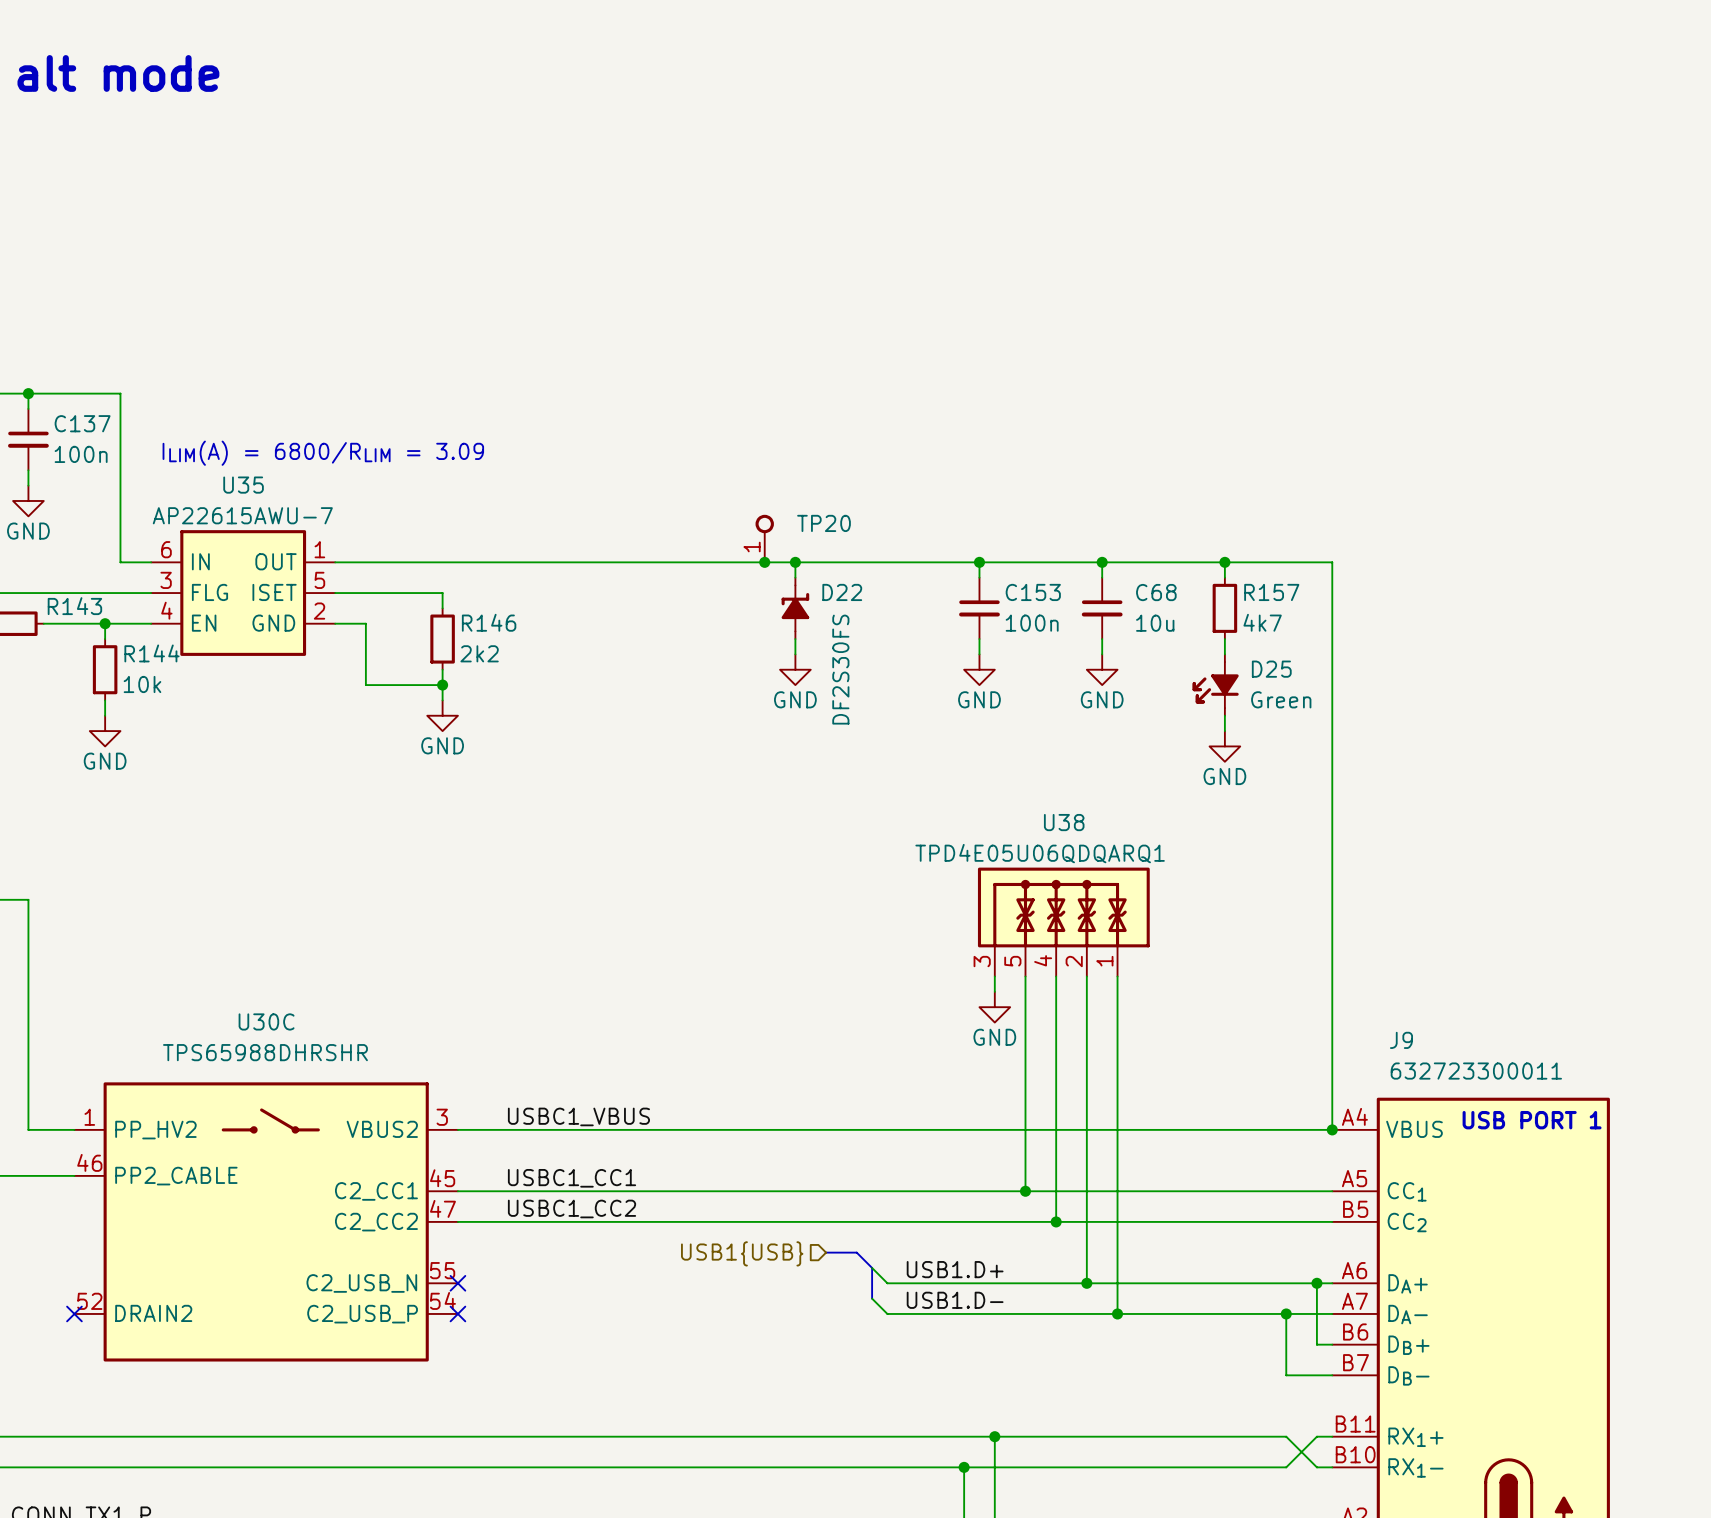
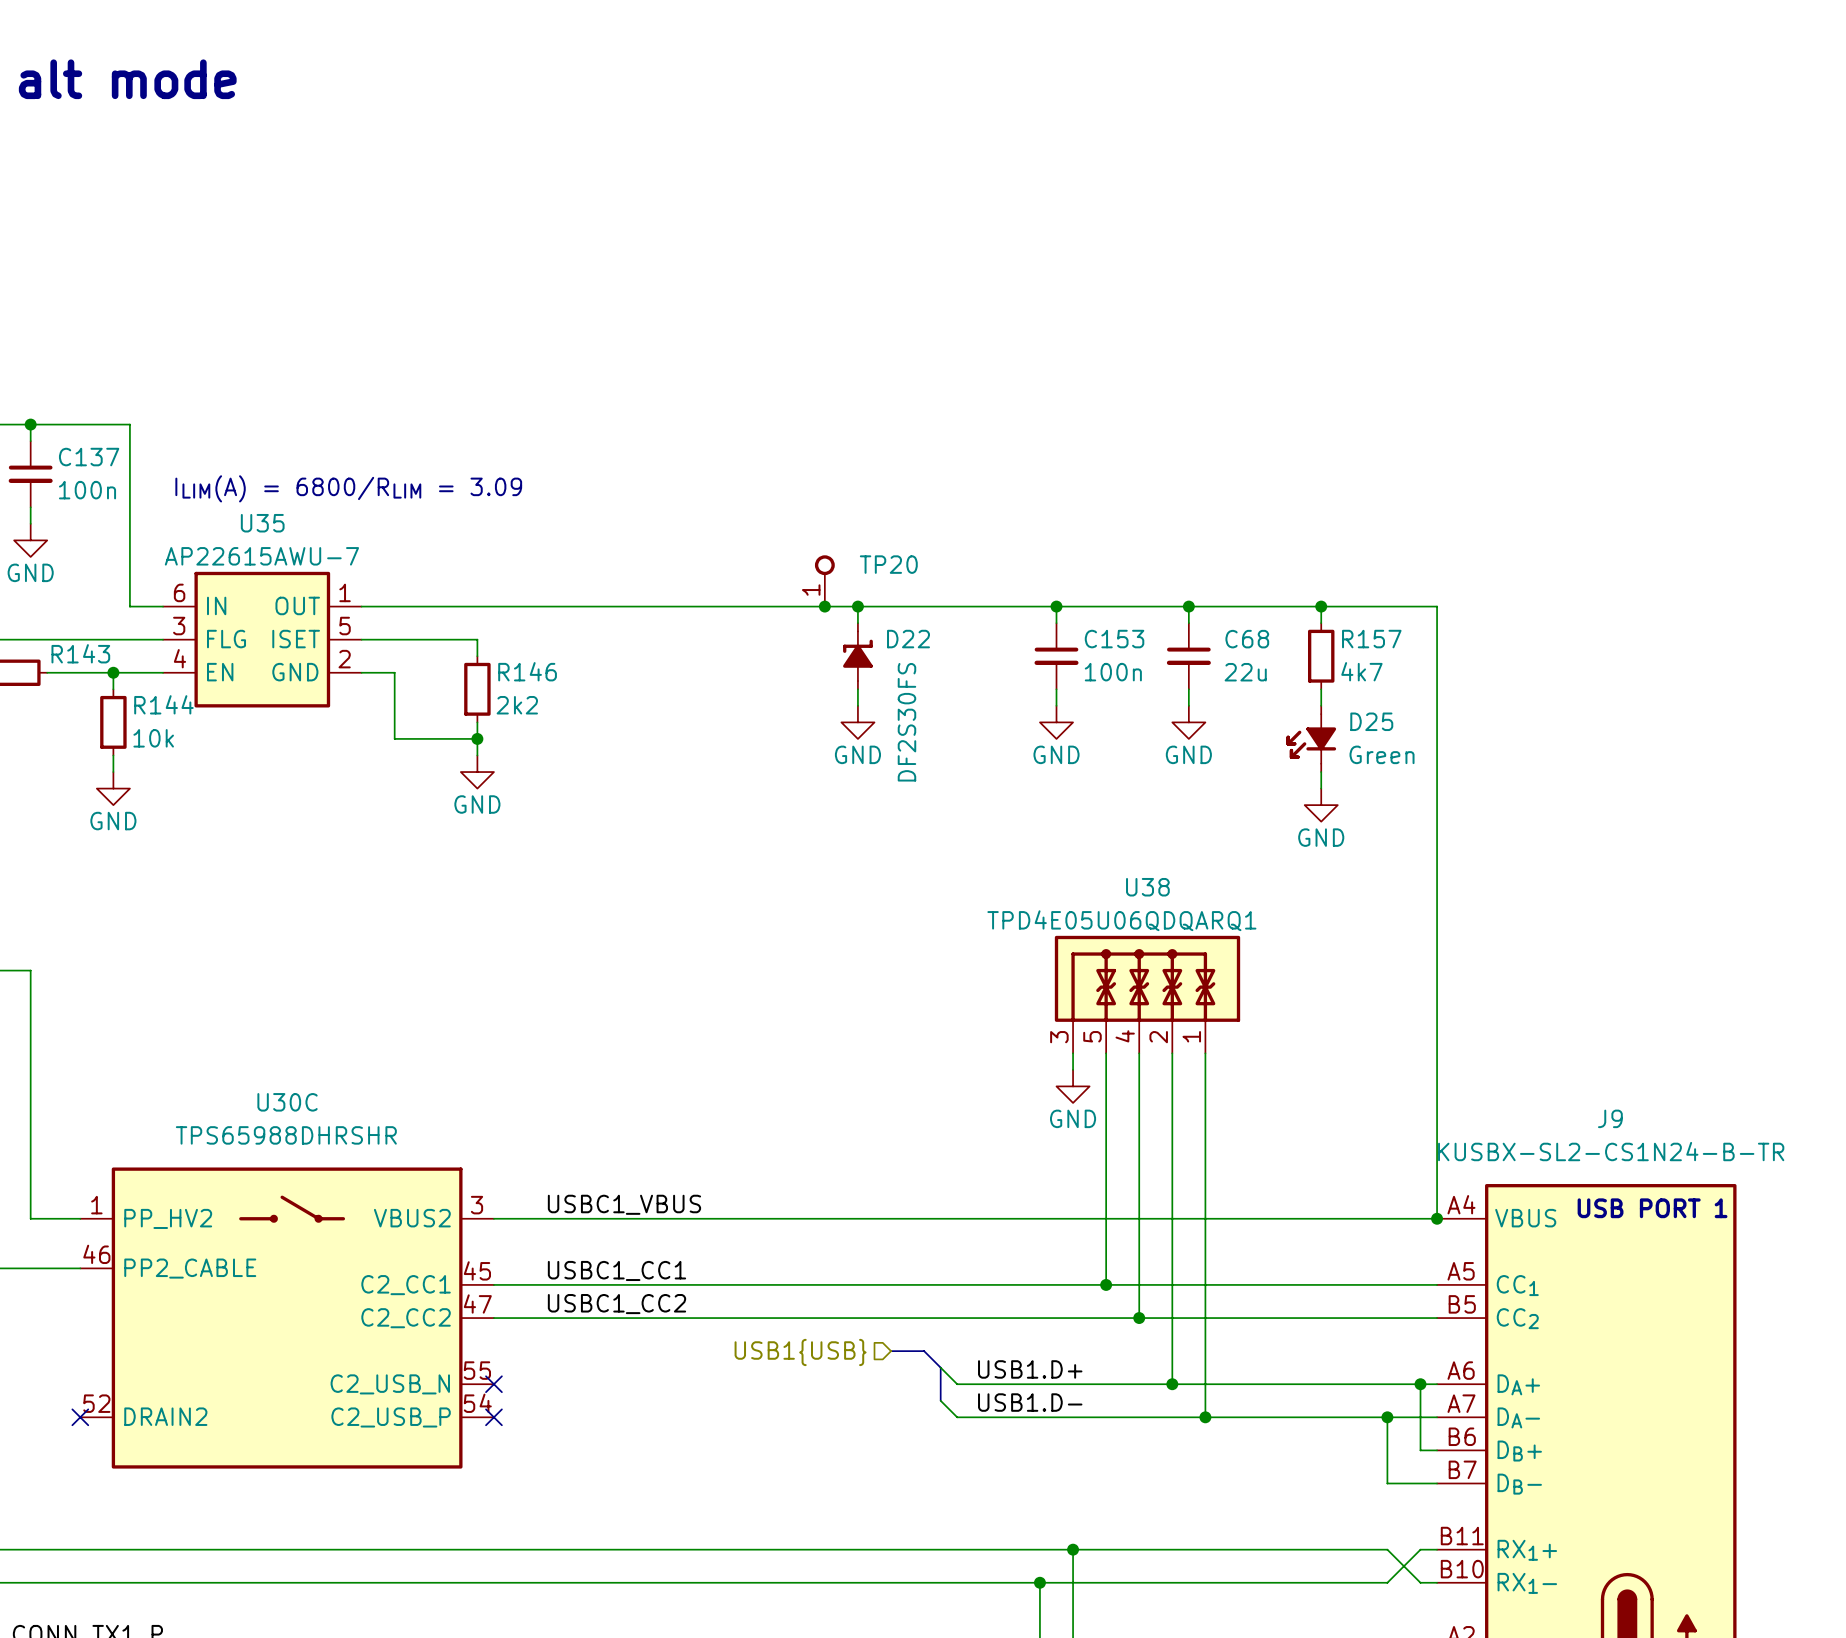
C68 text: 10u (1155, 623) -> 22u (1245, 672)
J9 name position: J9 (1401, 1040) -> J9 (1610, 1118)
J9 text: 632723300011 (1476, 1071) -> KUSBX-SL2-CS1N24-B-TR (1611, 1151)

